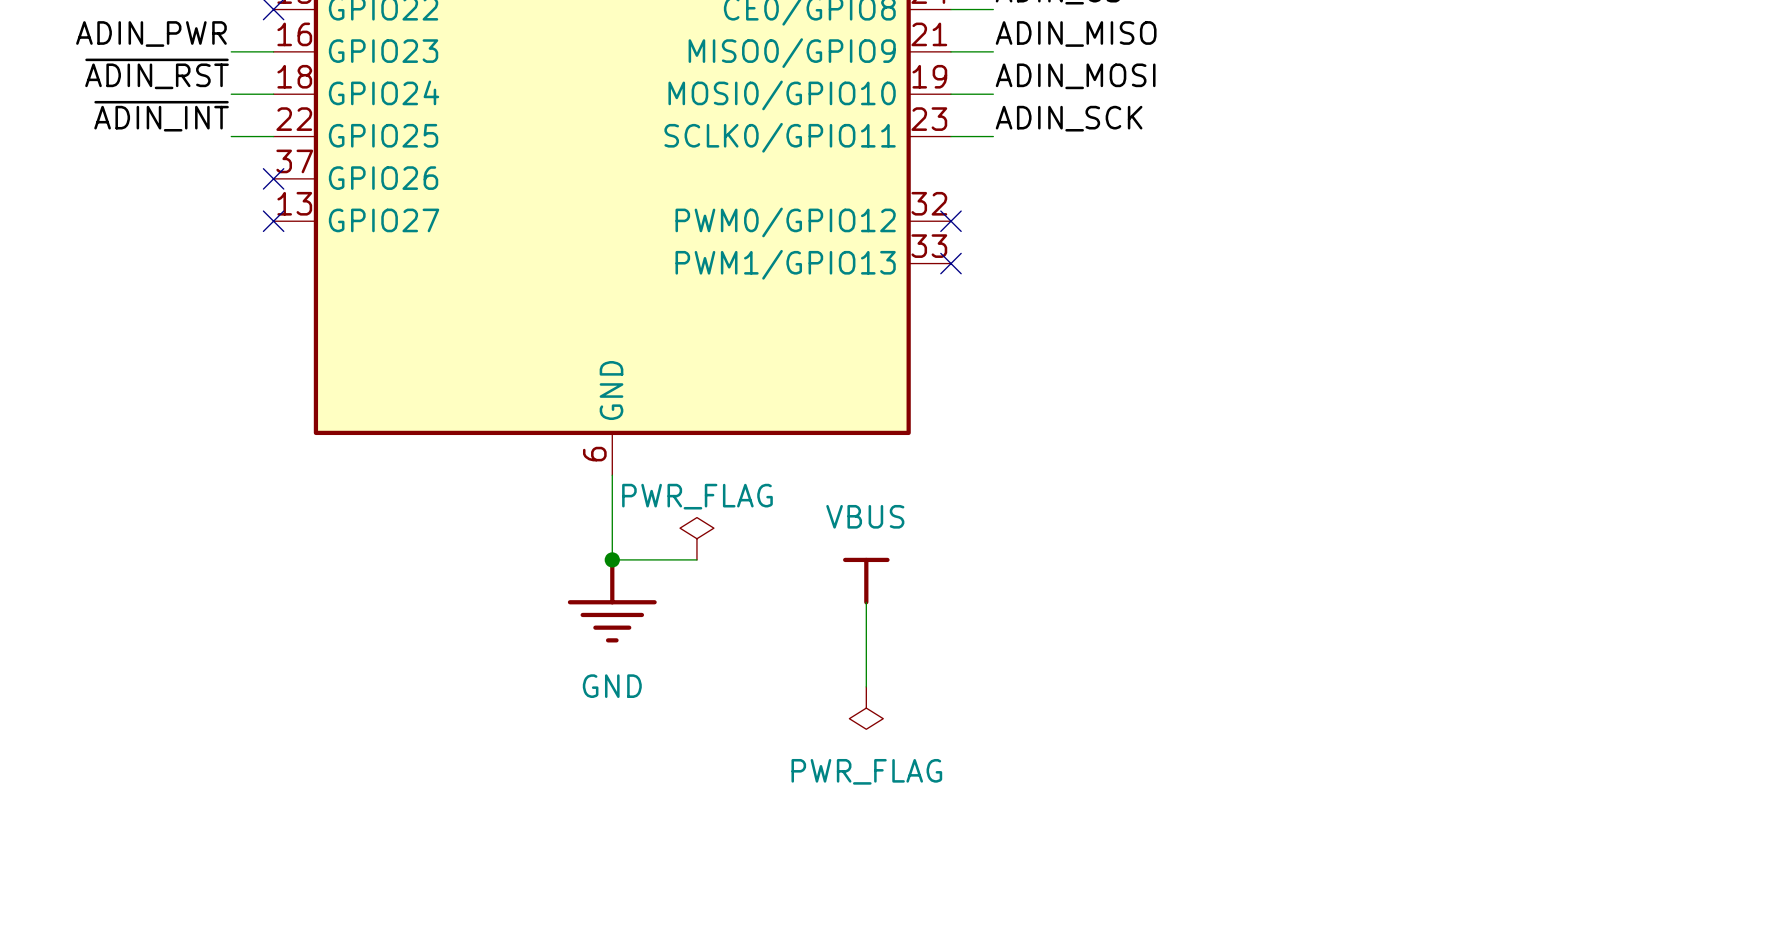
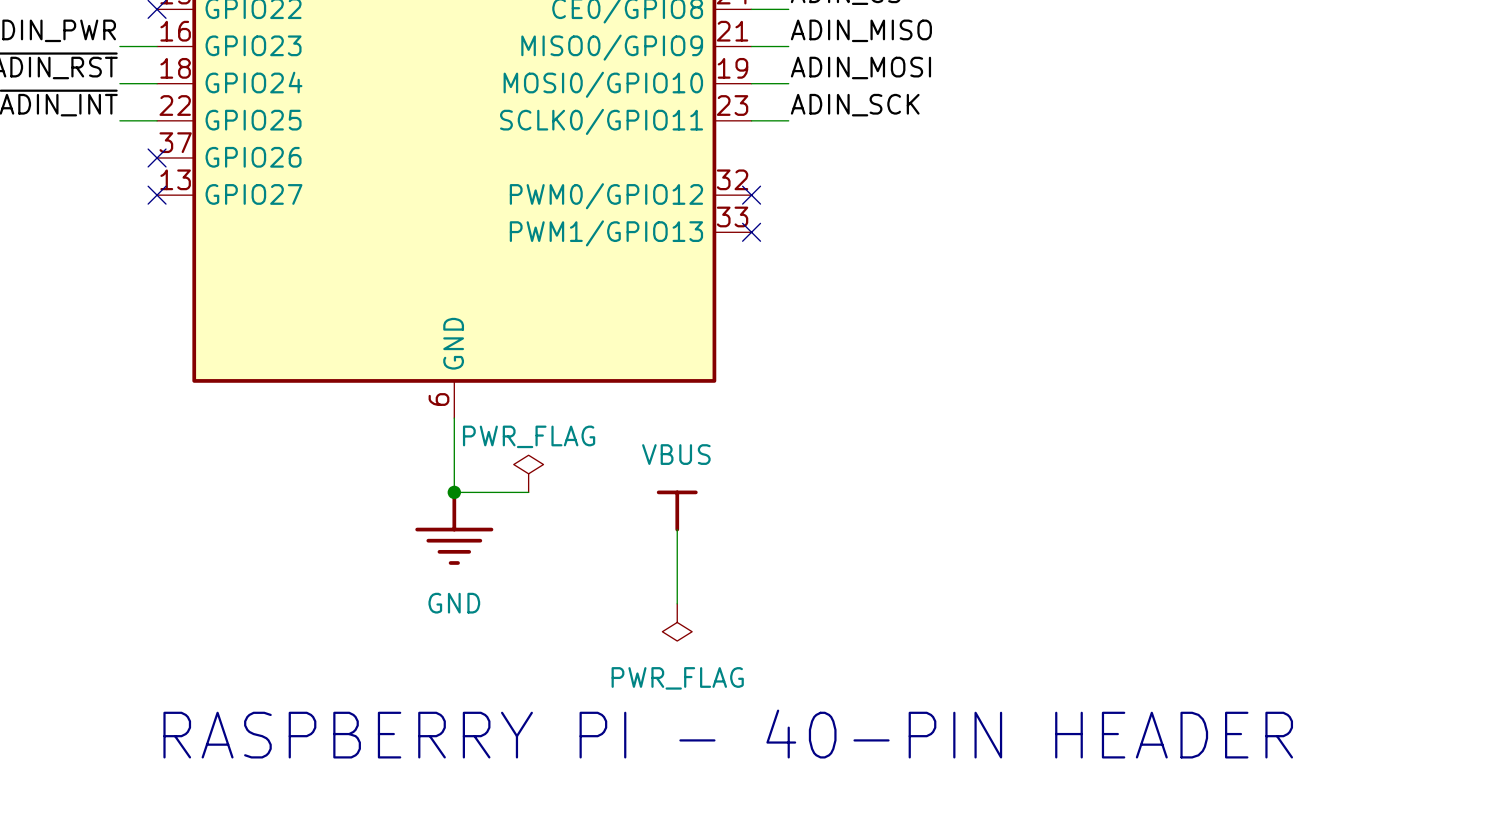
text: none -> RASPBERRY PI - 40-PIN HEADER (728, 734)

